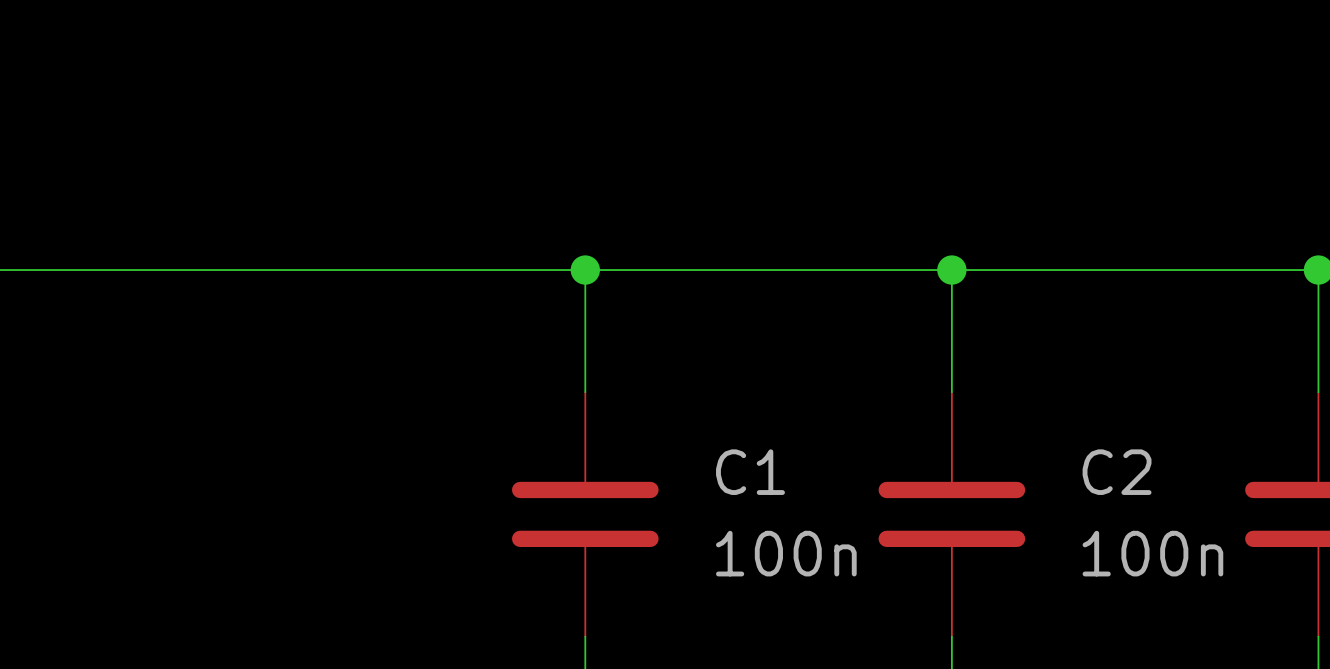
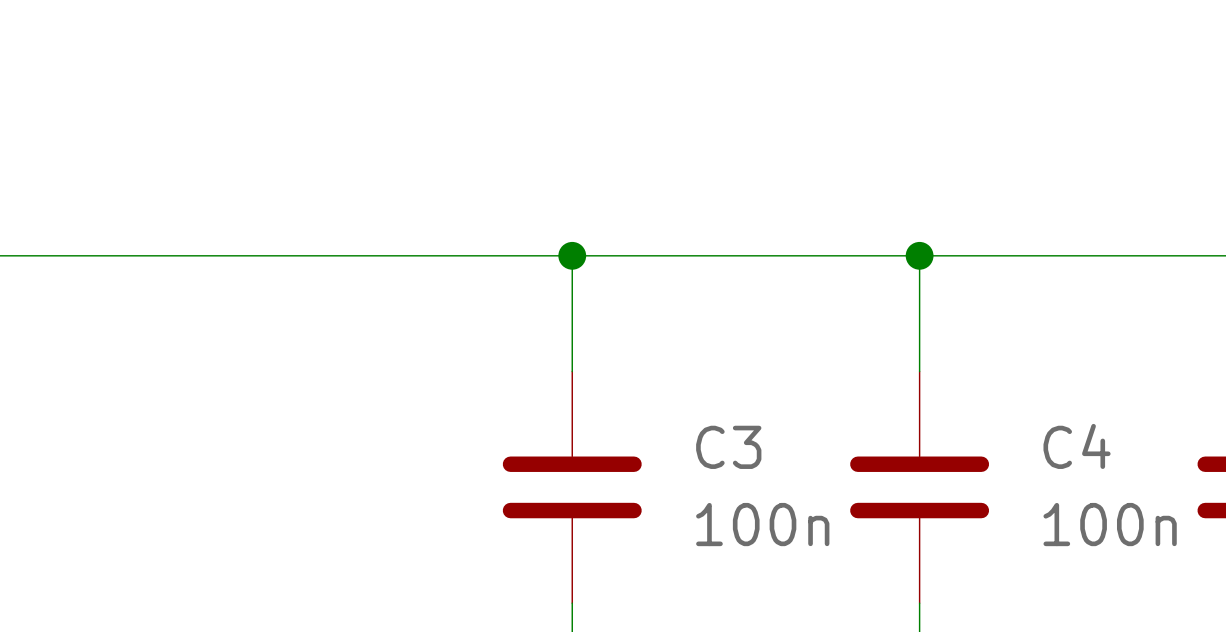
C1 name: C1 (750, 472) -> C3 (728, 447)
C2 name: C2 (1117, 472) -> C4 (1077, 446)

